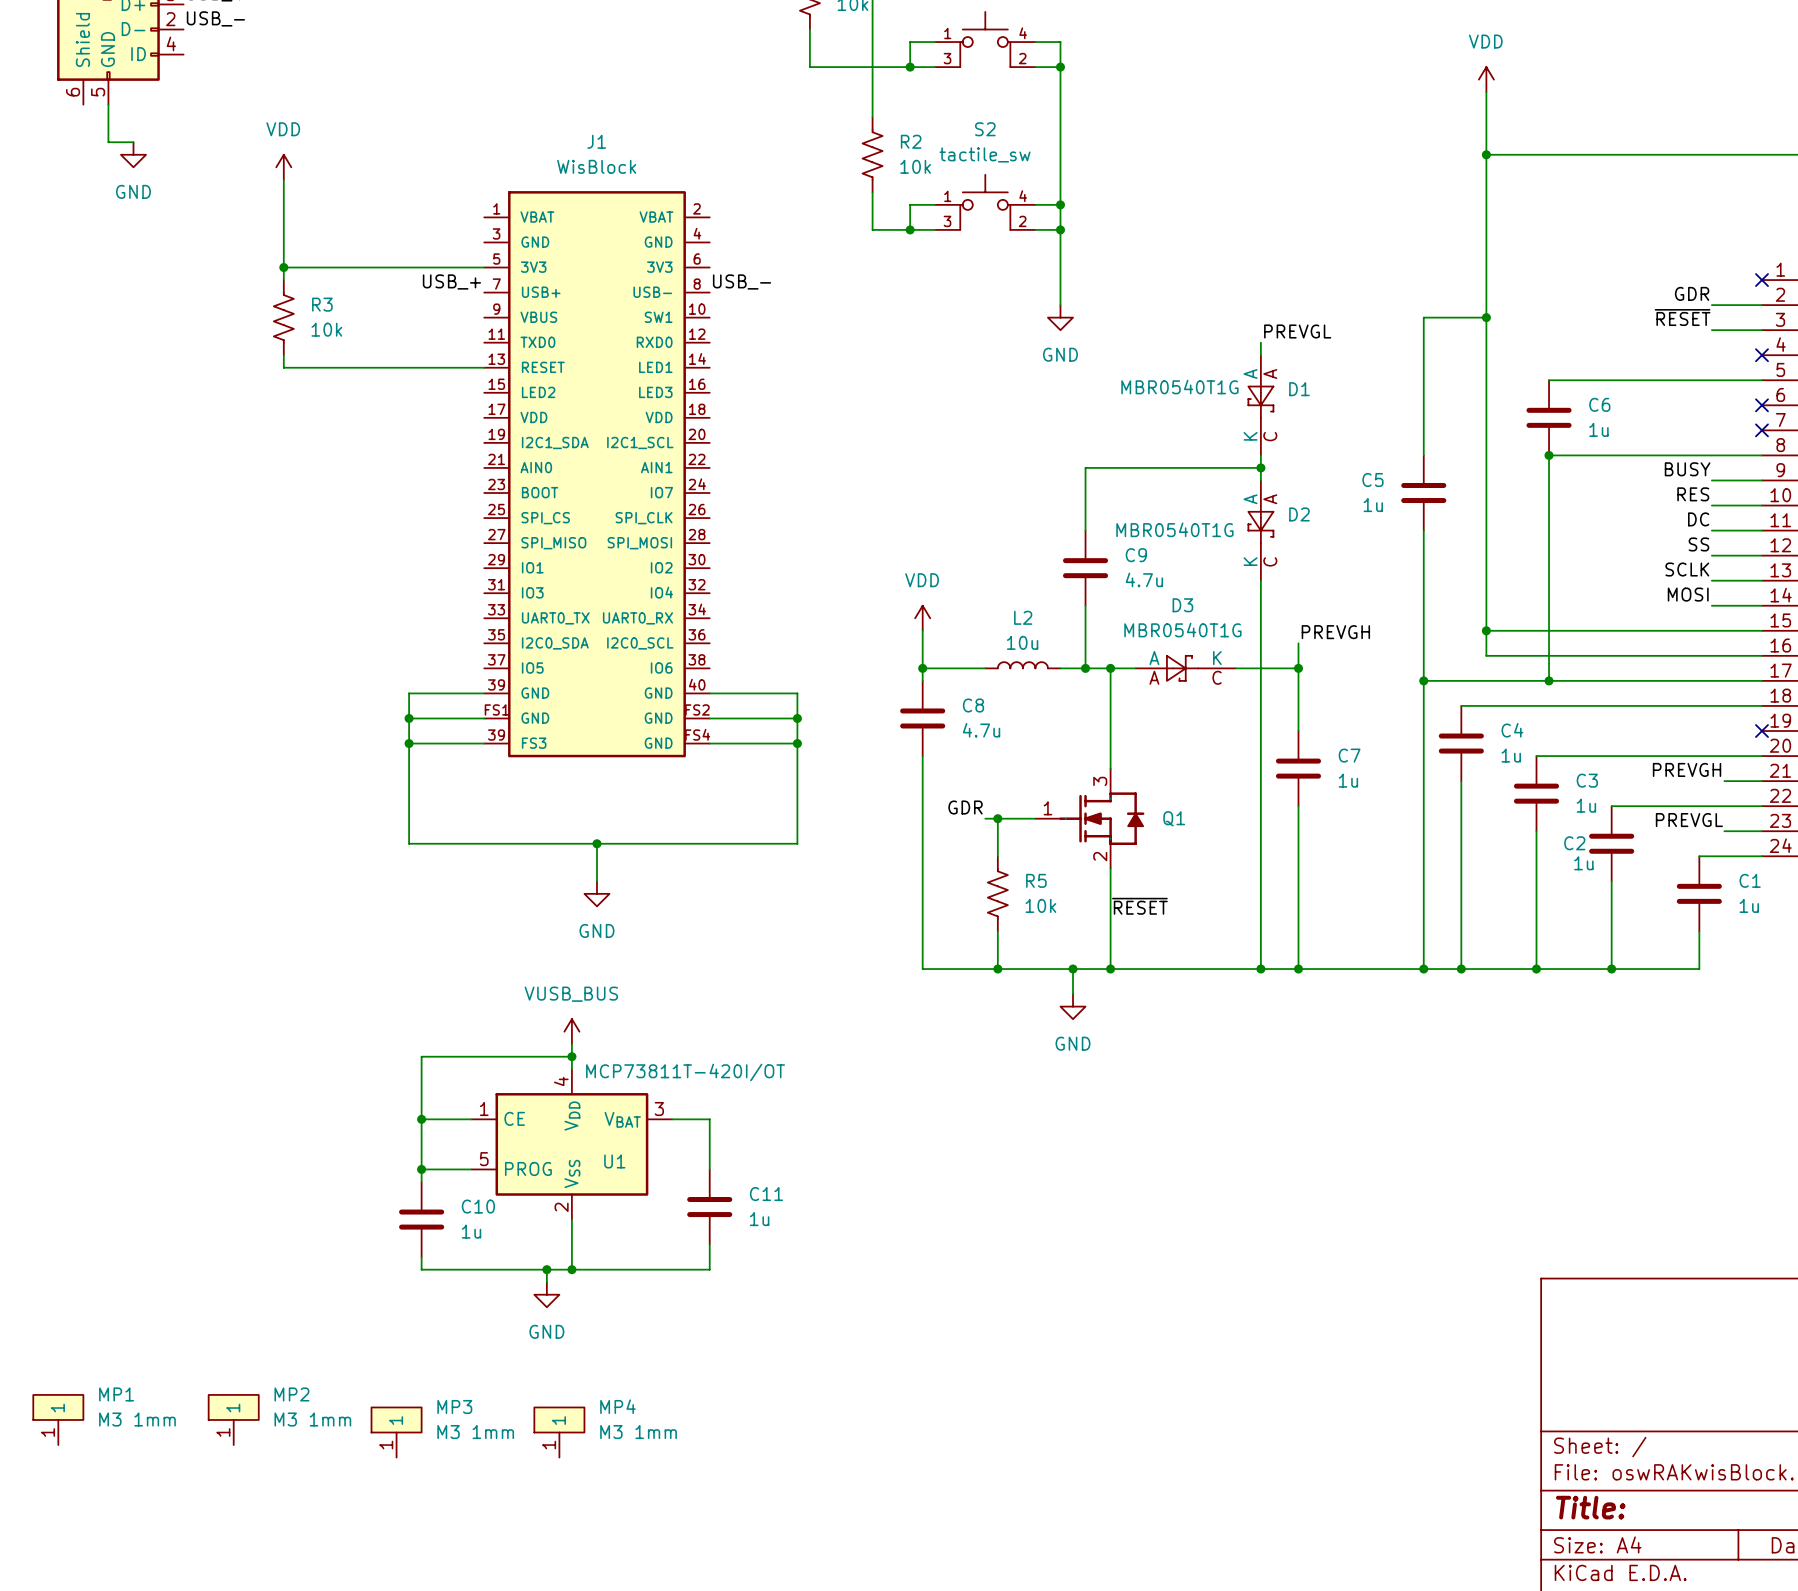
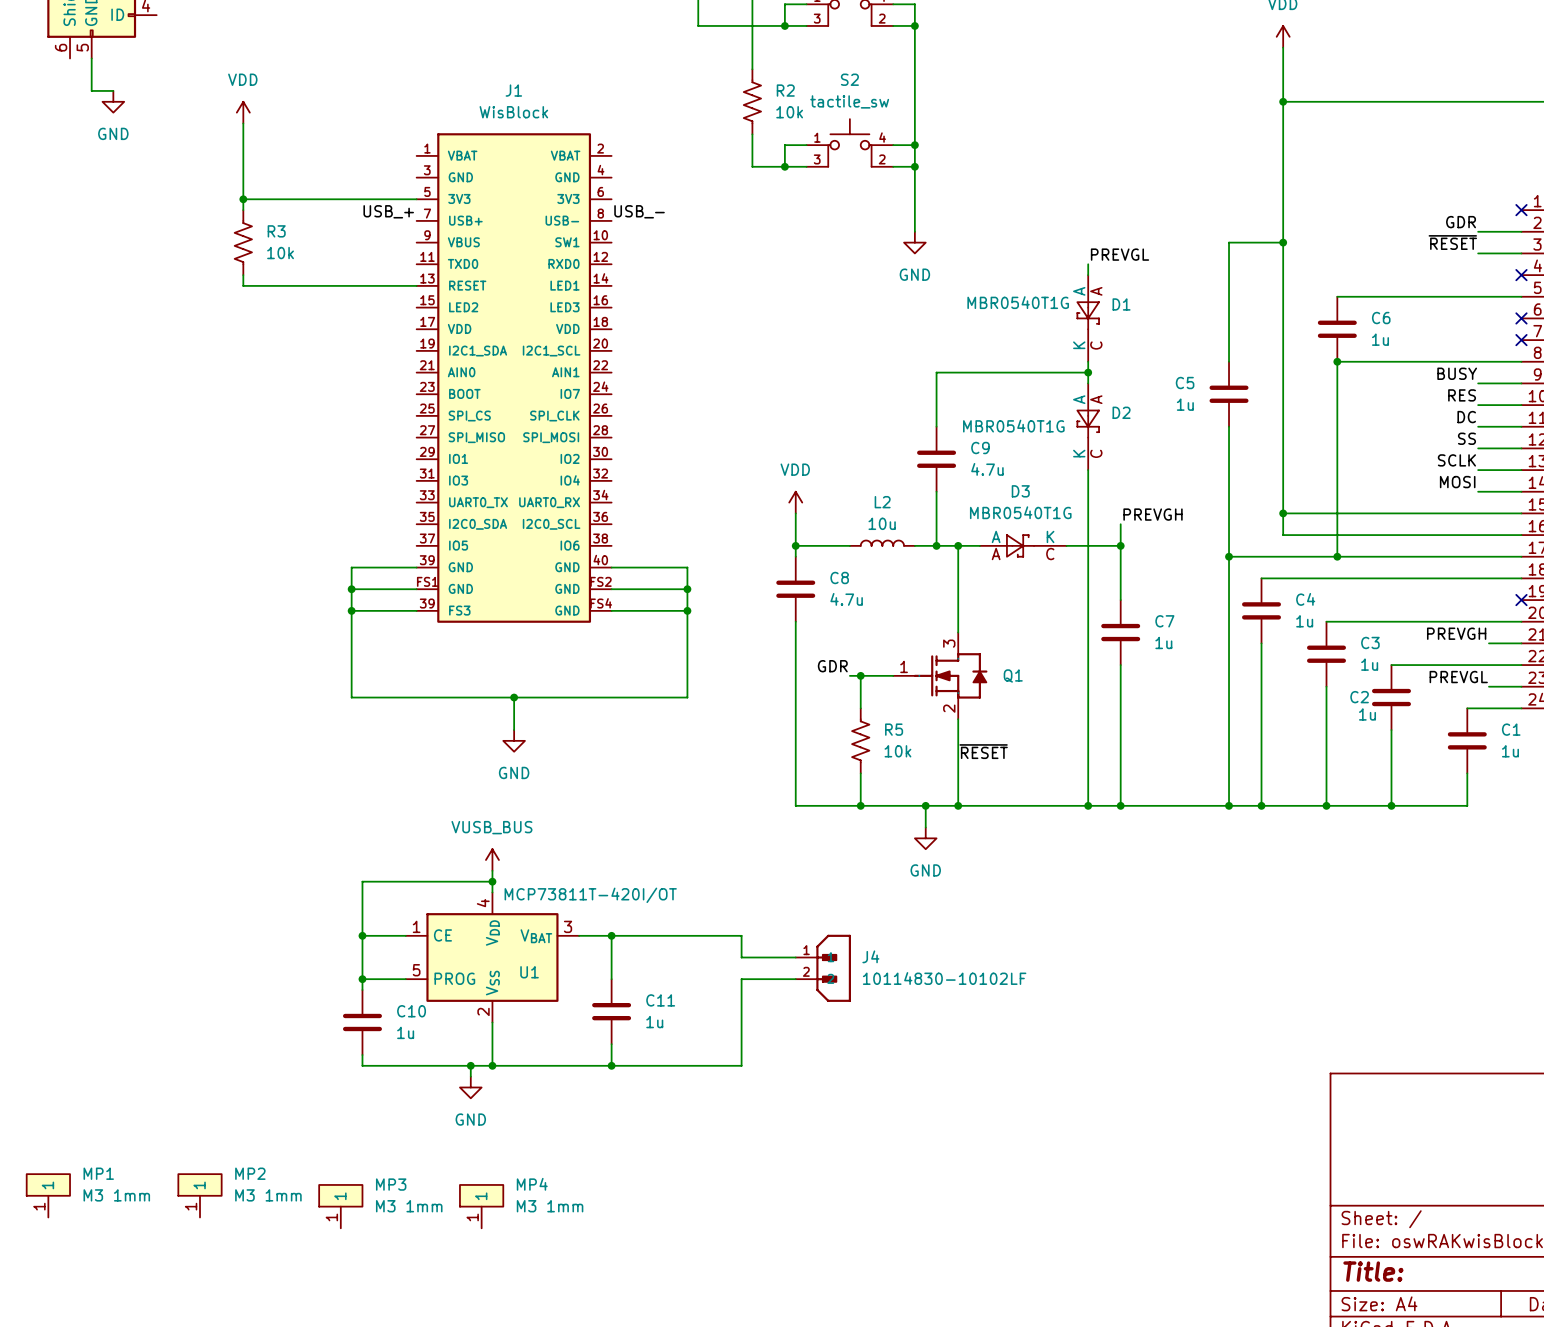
wire: none -> (611, 935) (741, 935) (741, 957) (795, 957)
junction: none -> (611, 935)
J4: none -> 10114830-10102LF (823, 968)
wire: none -> (795, 979) (741, 979) (741, 1065) (611, 1065)
junction: none -> (611, 1065)

